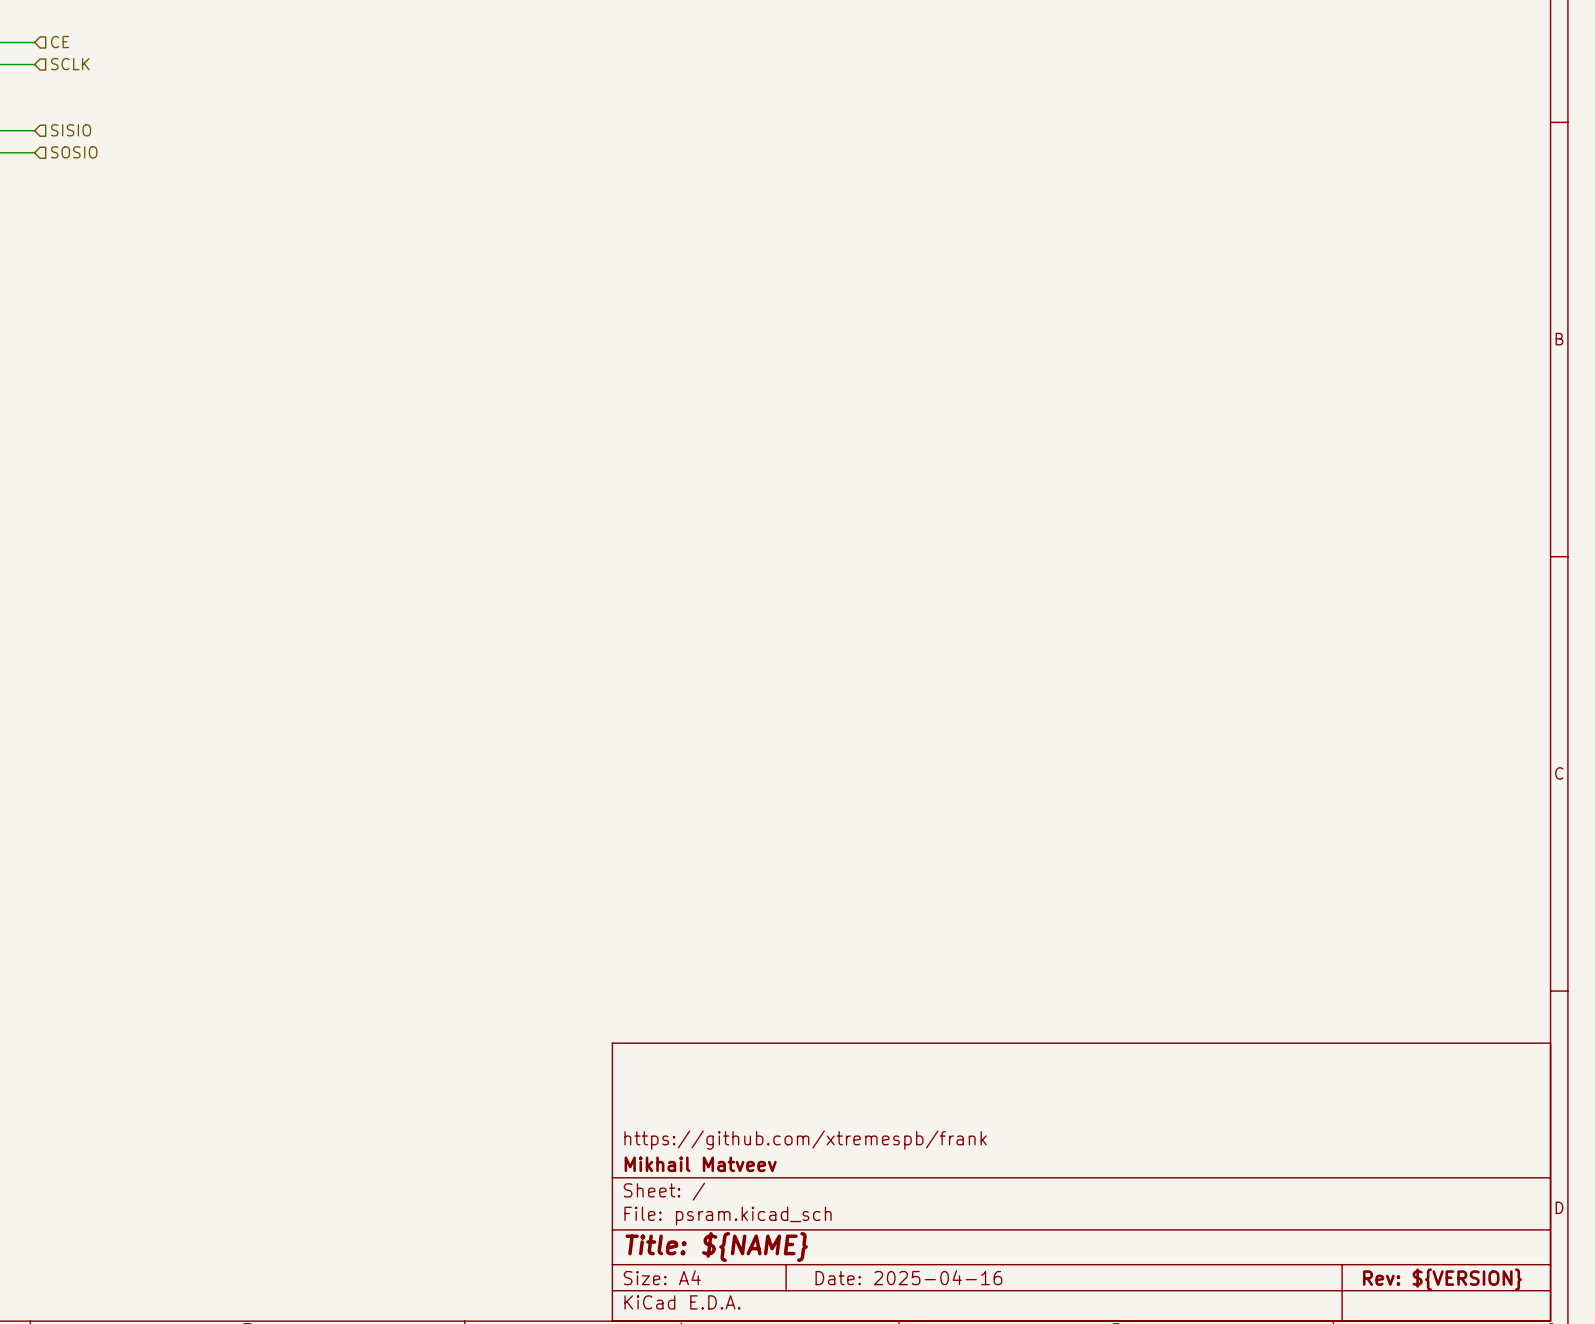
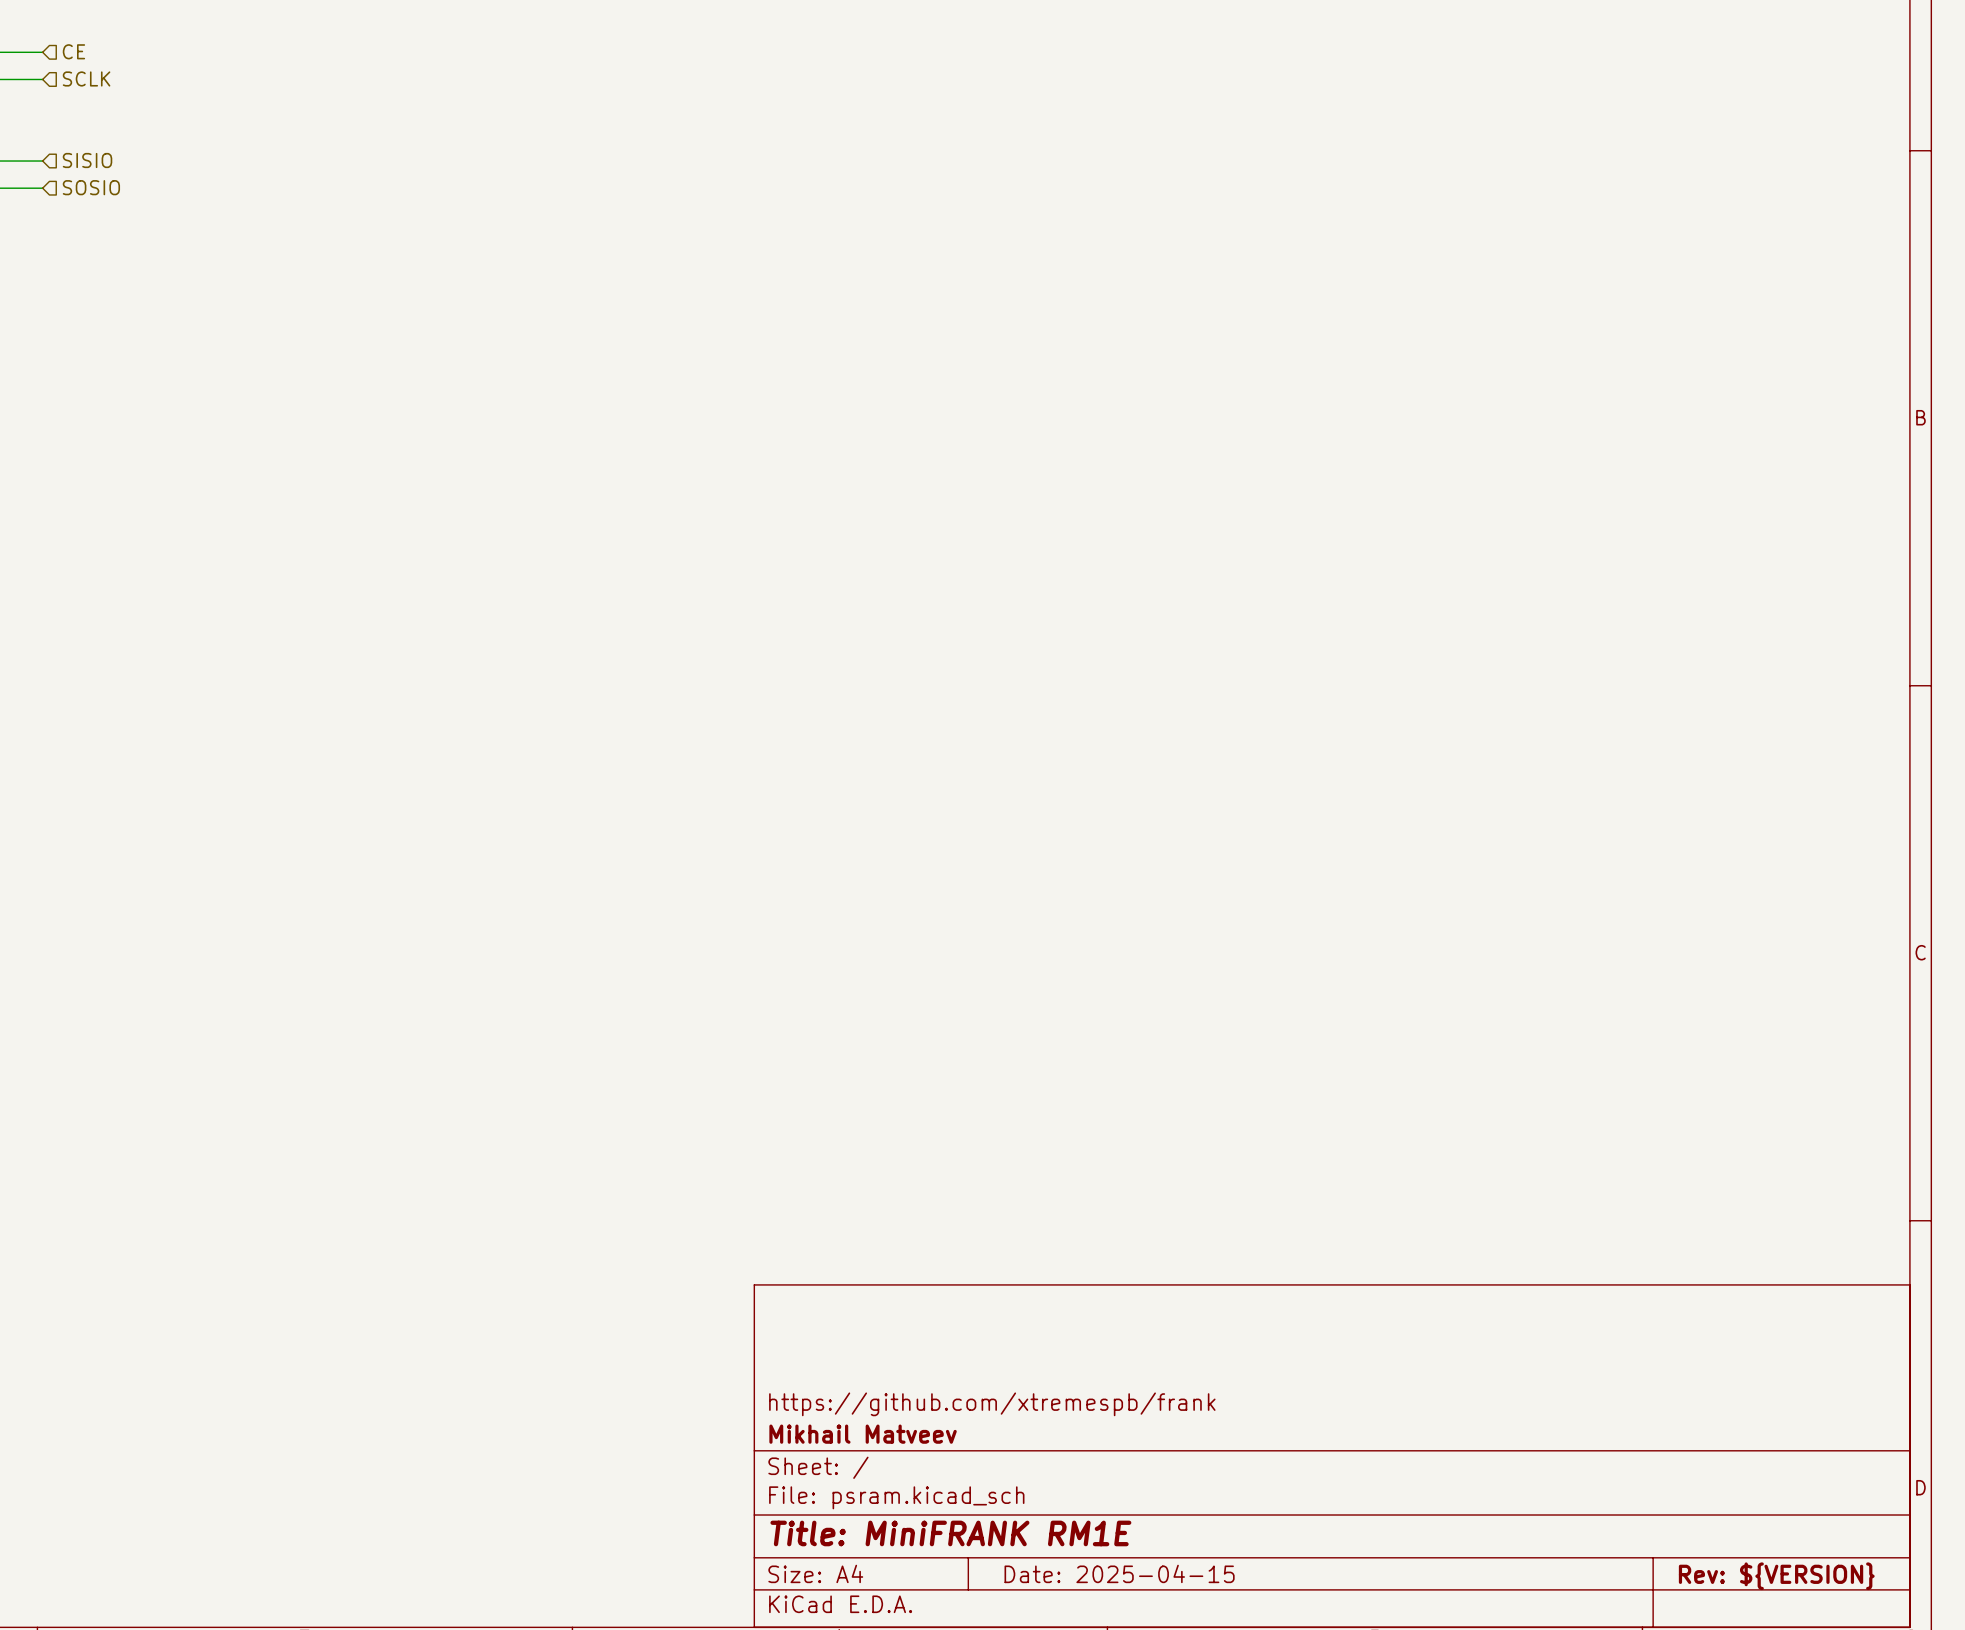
title block: Title: ${NAME} (716, 1246) -> Title: MiniFRANK RM1E (950, 1533)
title block: Date: 2025-04-16 (908, 1277) -> Date: 2025-04-15 (1119, 1573)

